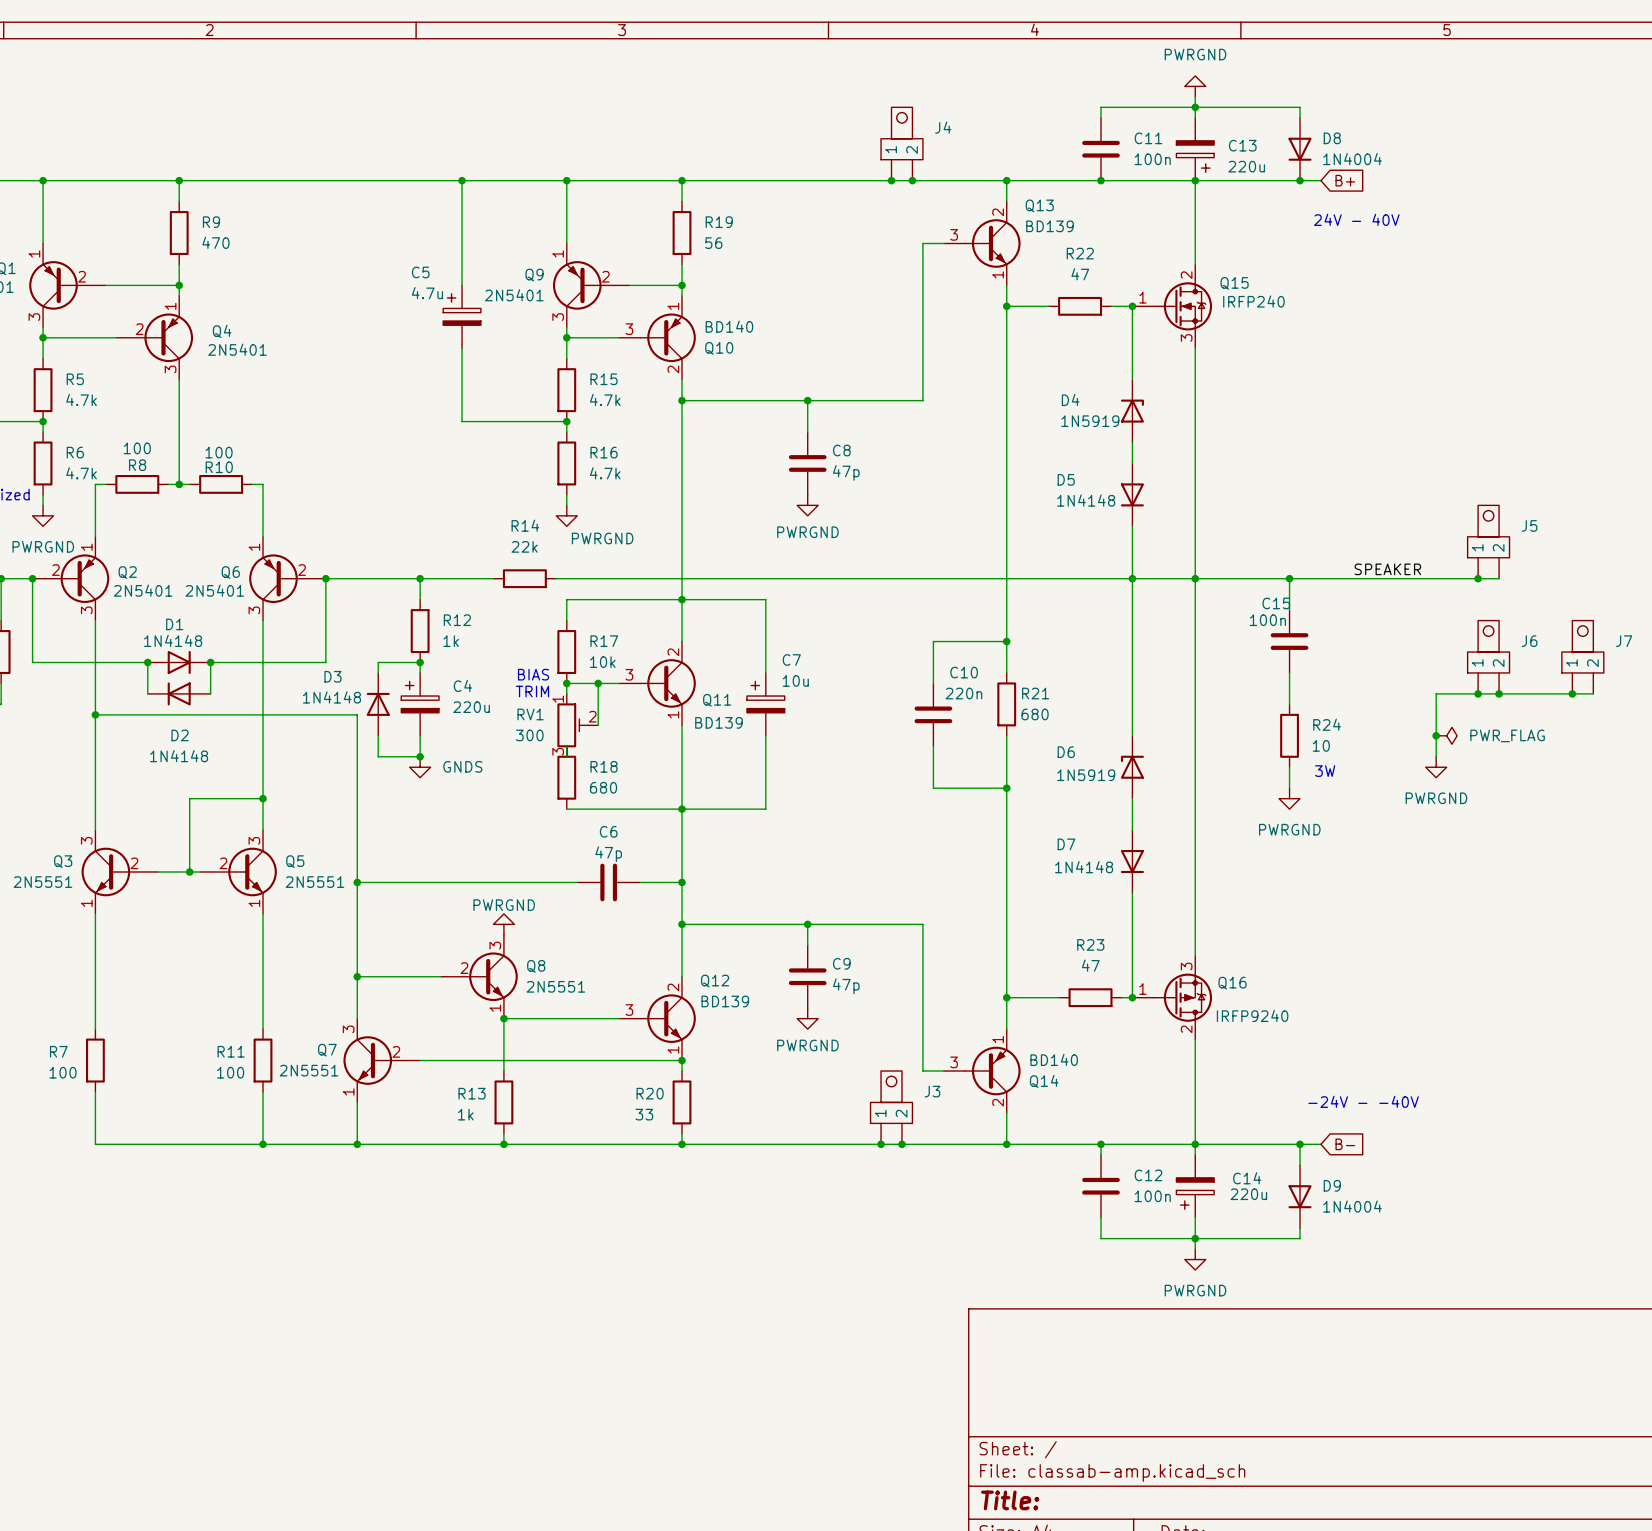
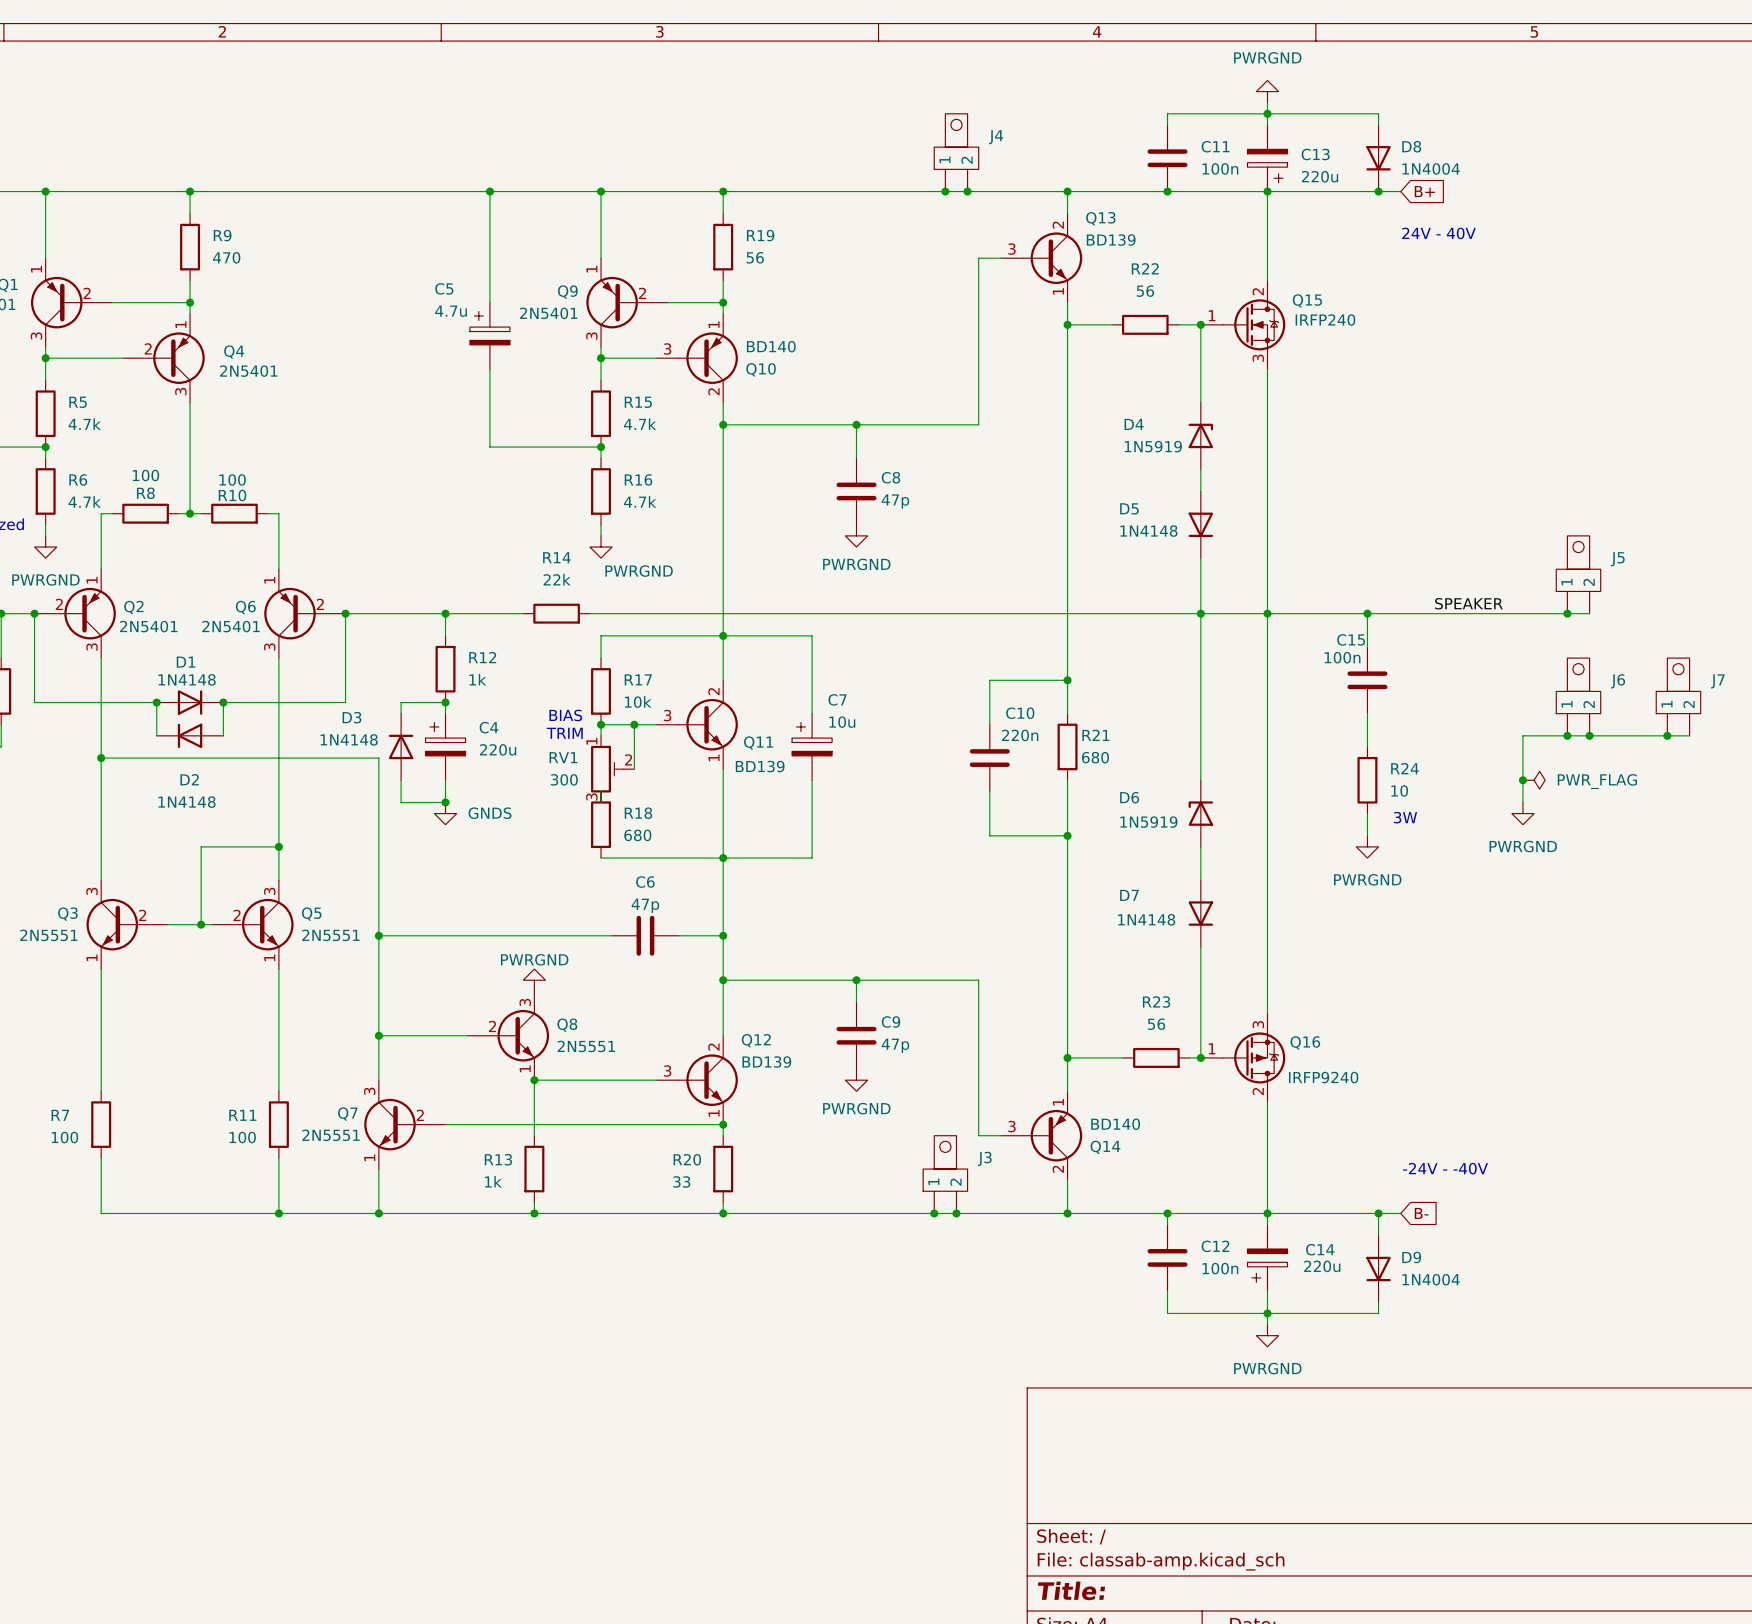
R22 value: 47 (1080, 274) -> 56 (1145, 291)
R23 value: 47 (1090, 965) -> 56 (1156, 1024)

